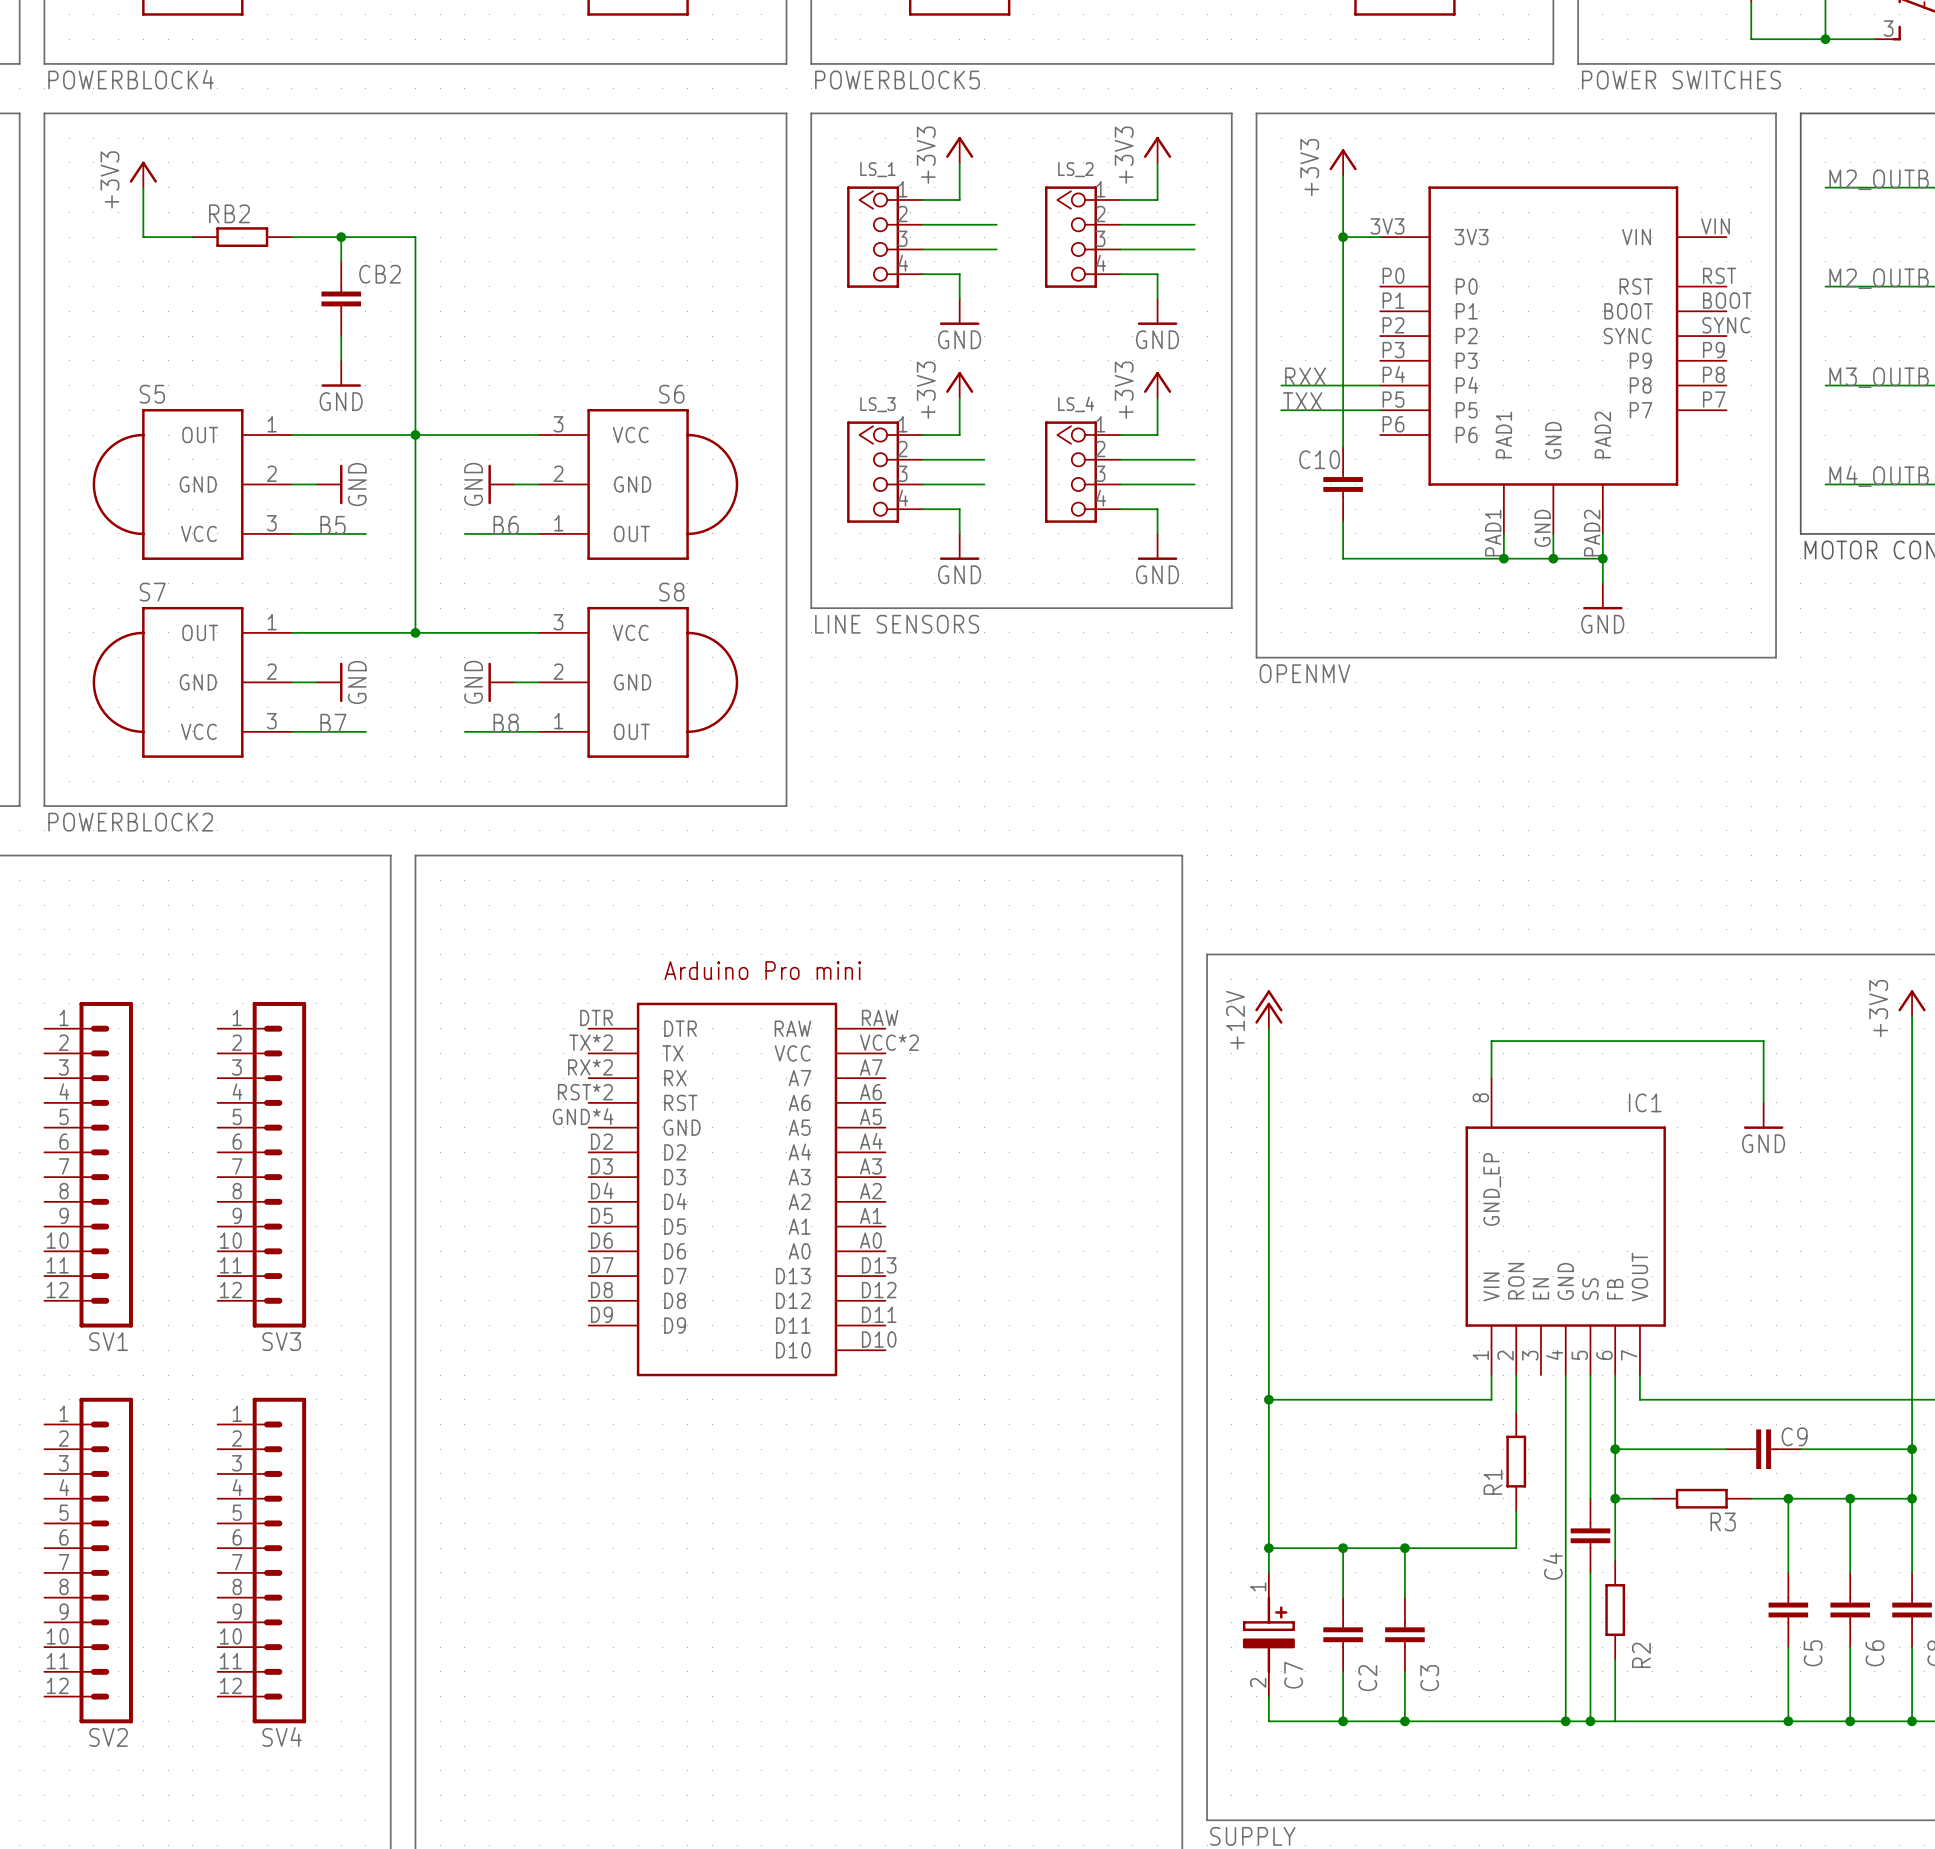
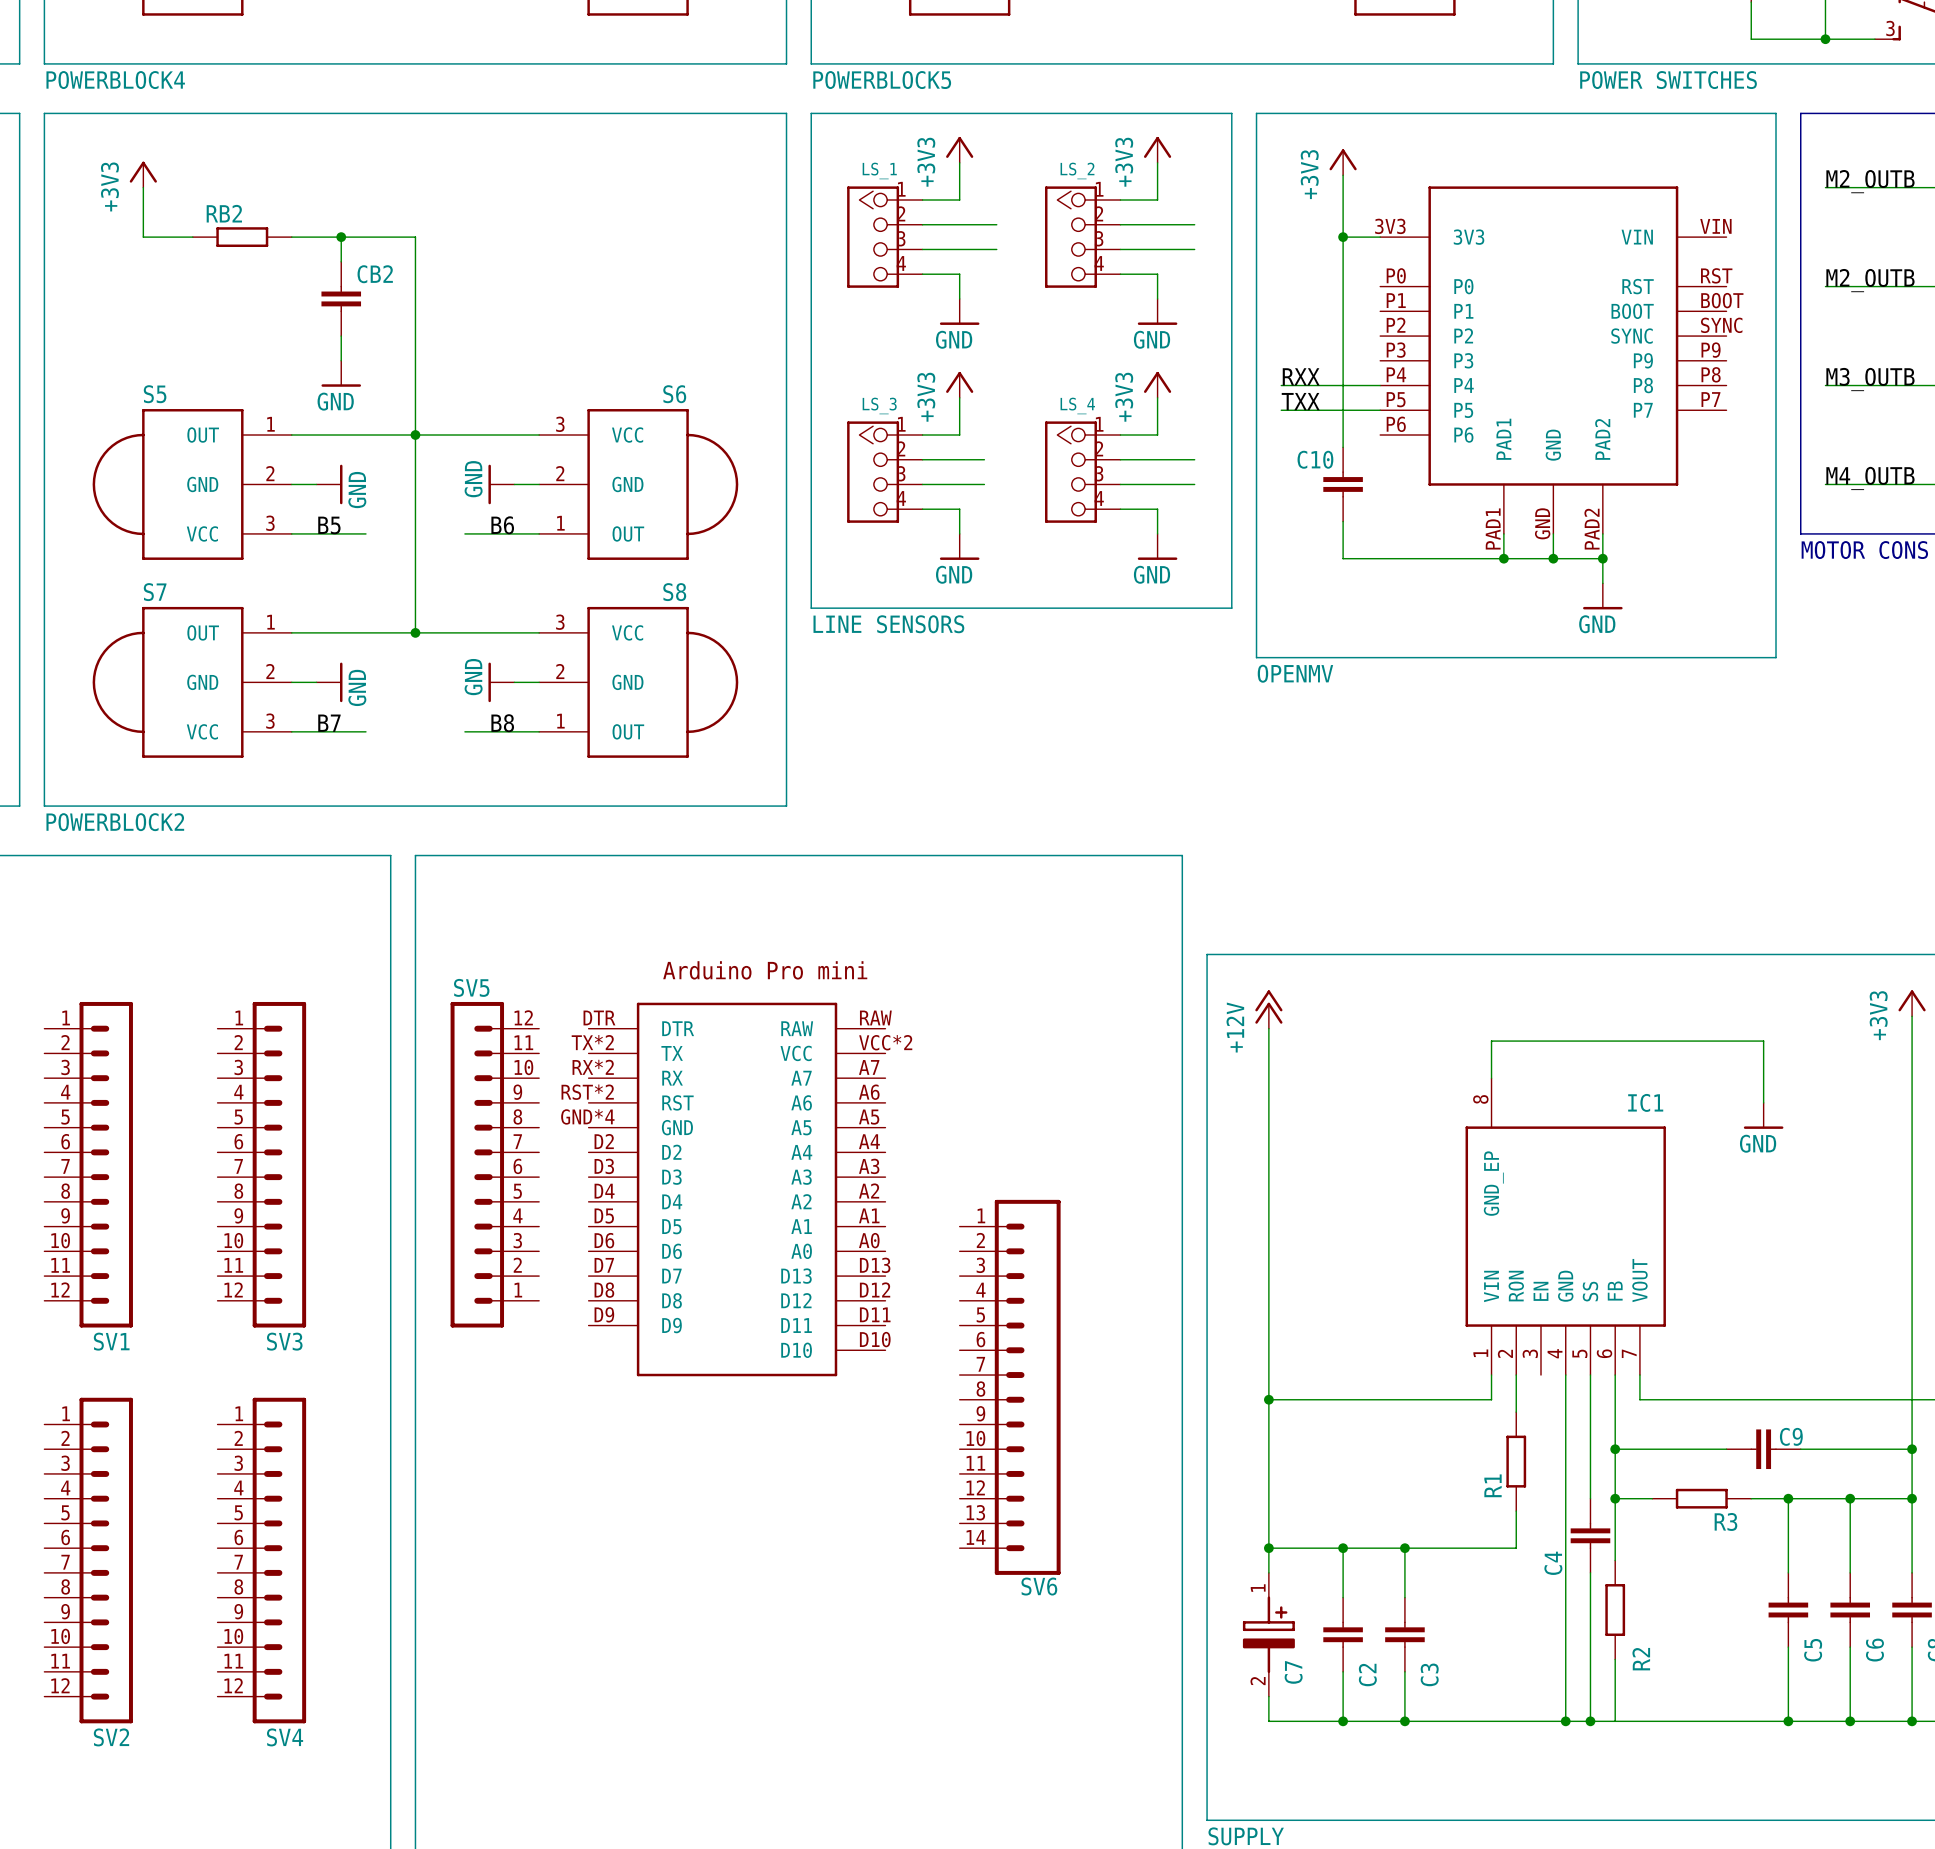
SV5: none -> (494, 1164)
SV6: none -> (1010, 1387)

